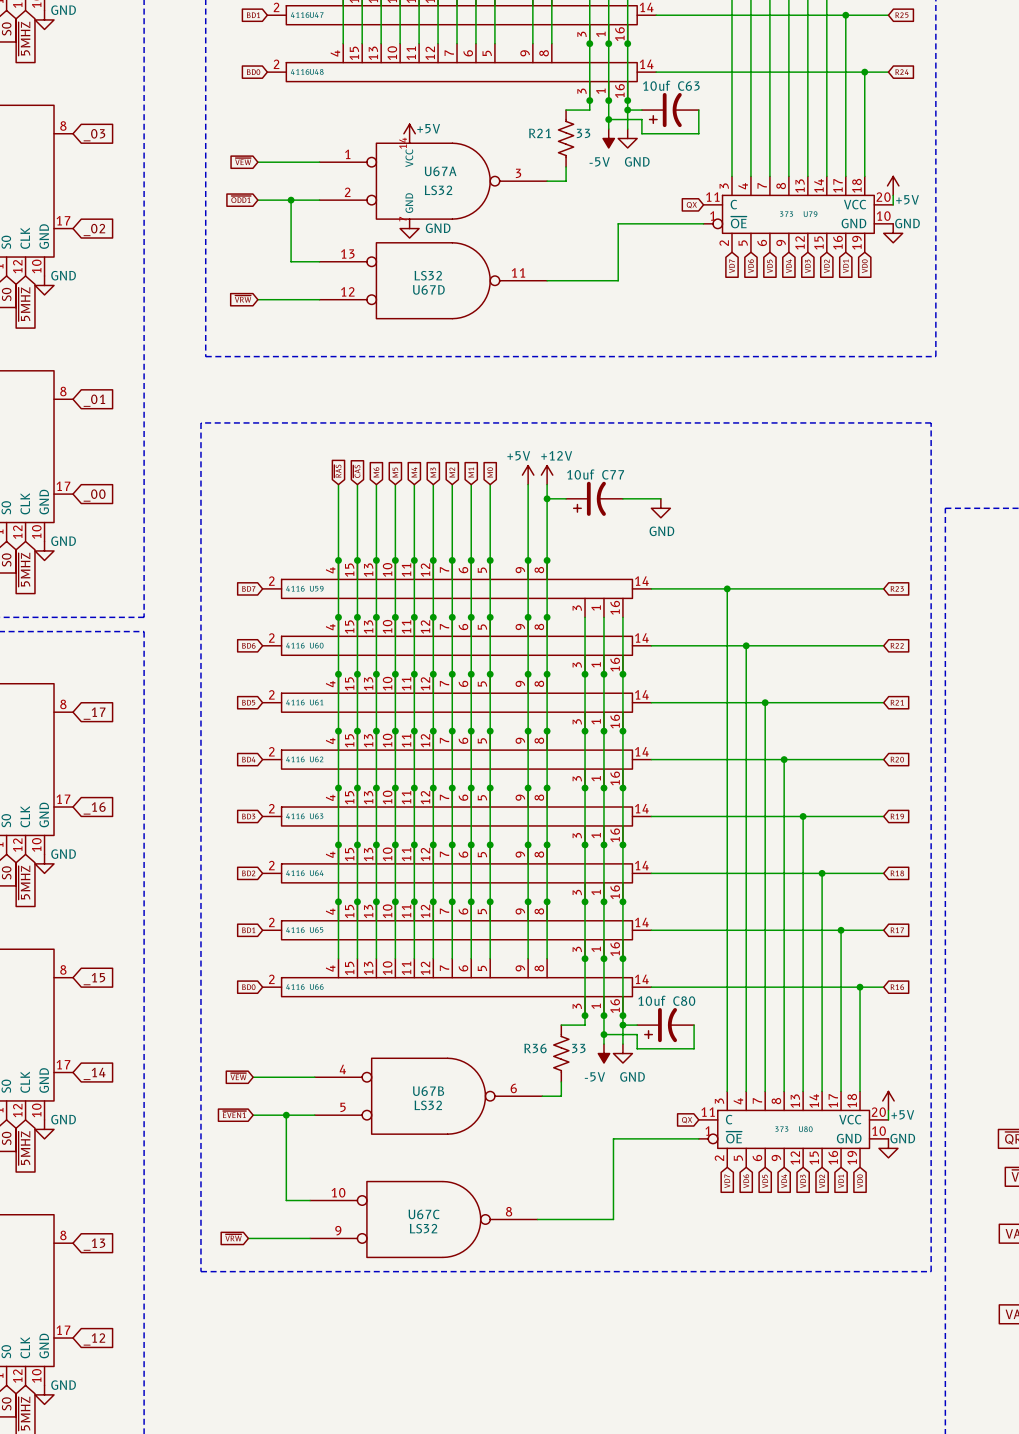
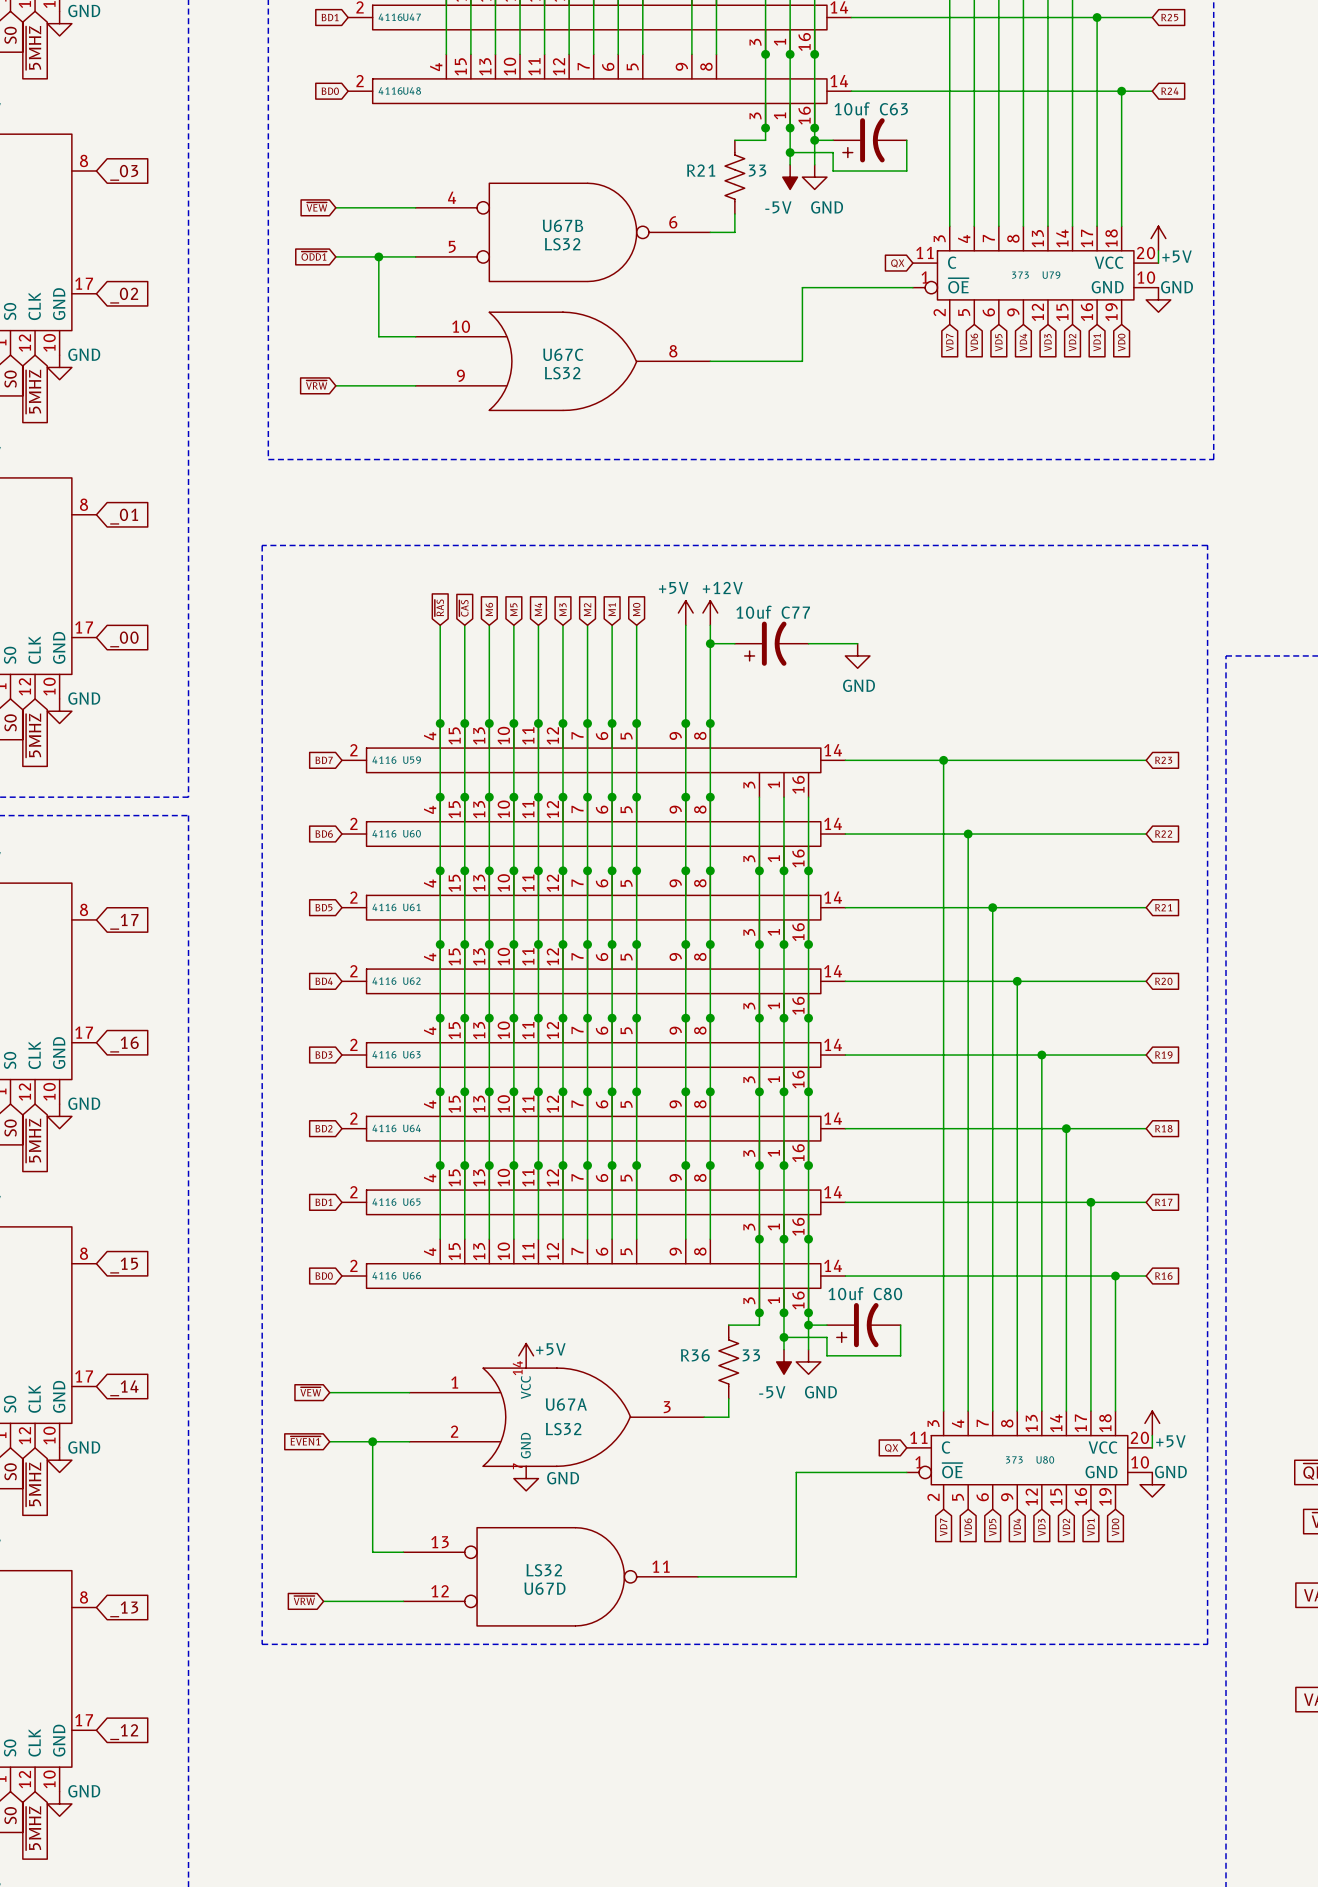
power symbol: +5V (409, 133) -> none
U67A symbol: [319, 143, 548, 220] -> [409, 1368, 705, 1467]
power symbol: GND (409, 228) -> none
U67D position: (433, 280) -> (550, 1576)
power symbol: none -> +5V (526, 1355)
U67B position: (428, 1096) -> (562, 232)
power symbol: none -> GND (526, 1478)
U67C symbol: [310, 1181, 538, 1258] -> [415, 312, 711, 411]

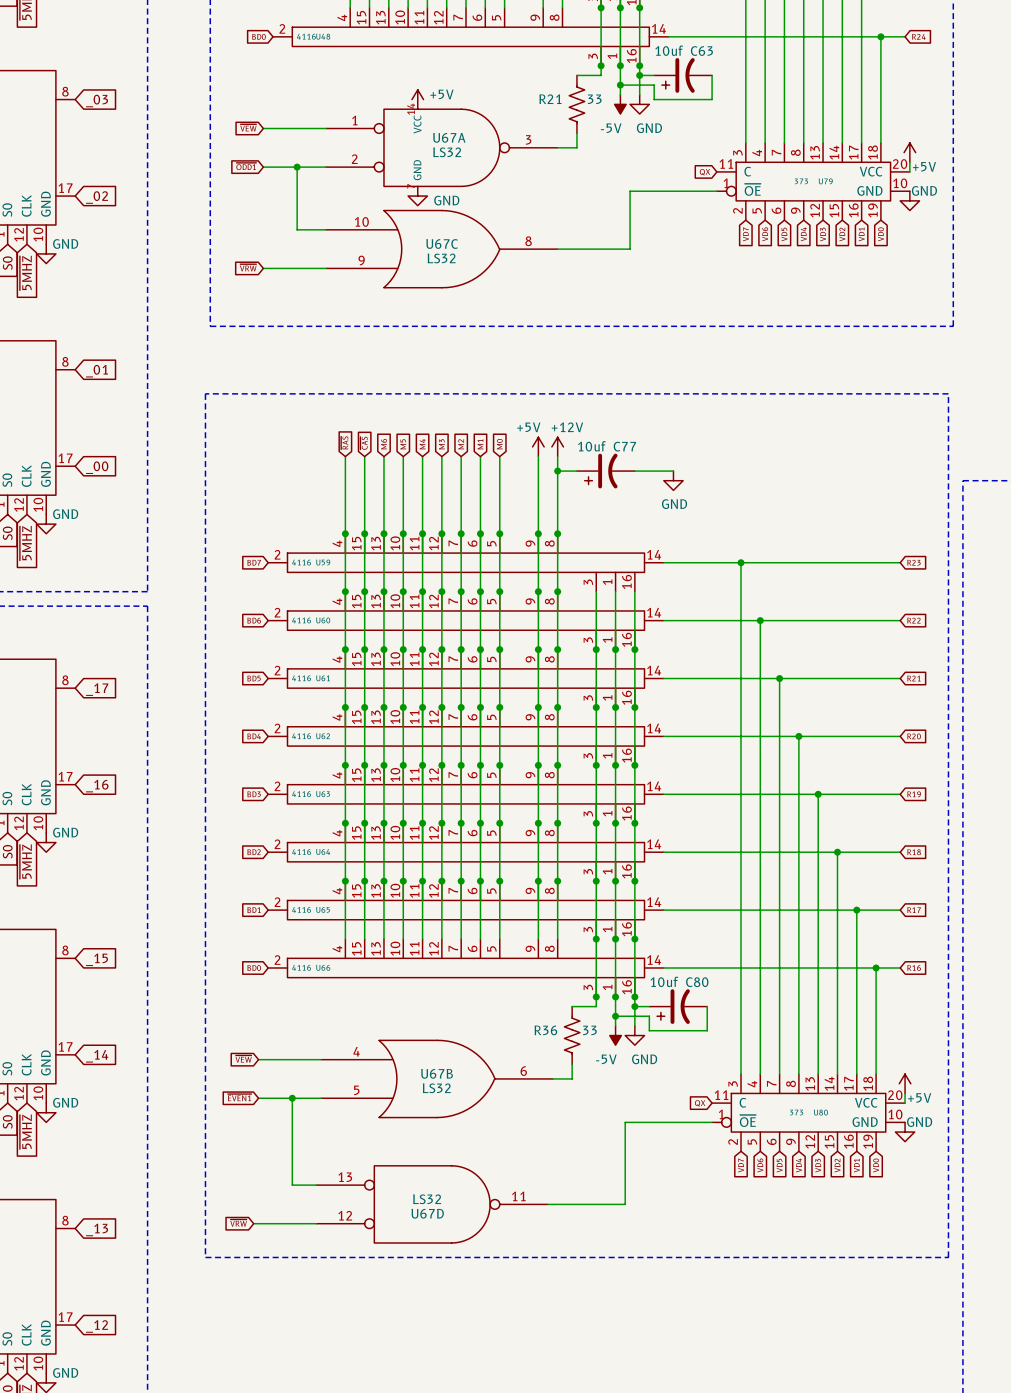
power symbol: none -> +5V (417, 99)
U67B symbol: [415, 183, 711, 282] -> [321, 1040, 553, 1118]
power symbol: none -> GND (417, 196)
power symbol: +5V (526, 1355) -> none
U67A symbol: [409, 1368, 705, 1467] -> [326, 109, 558, 187]
power symbol: GND (526, 1478) -> none

